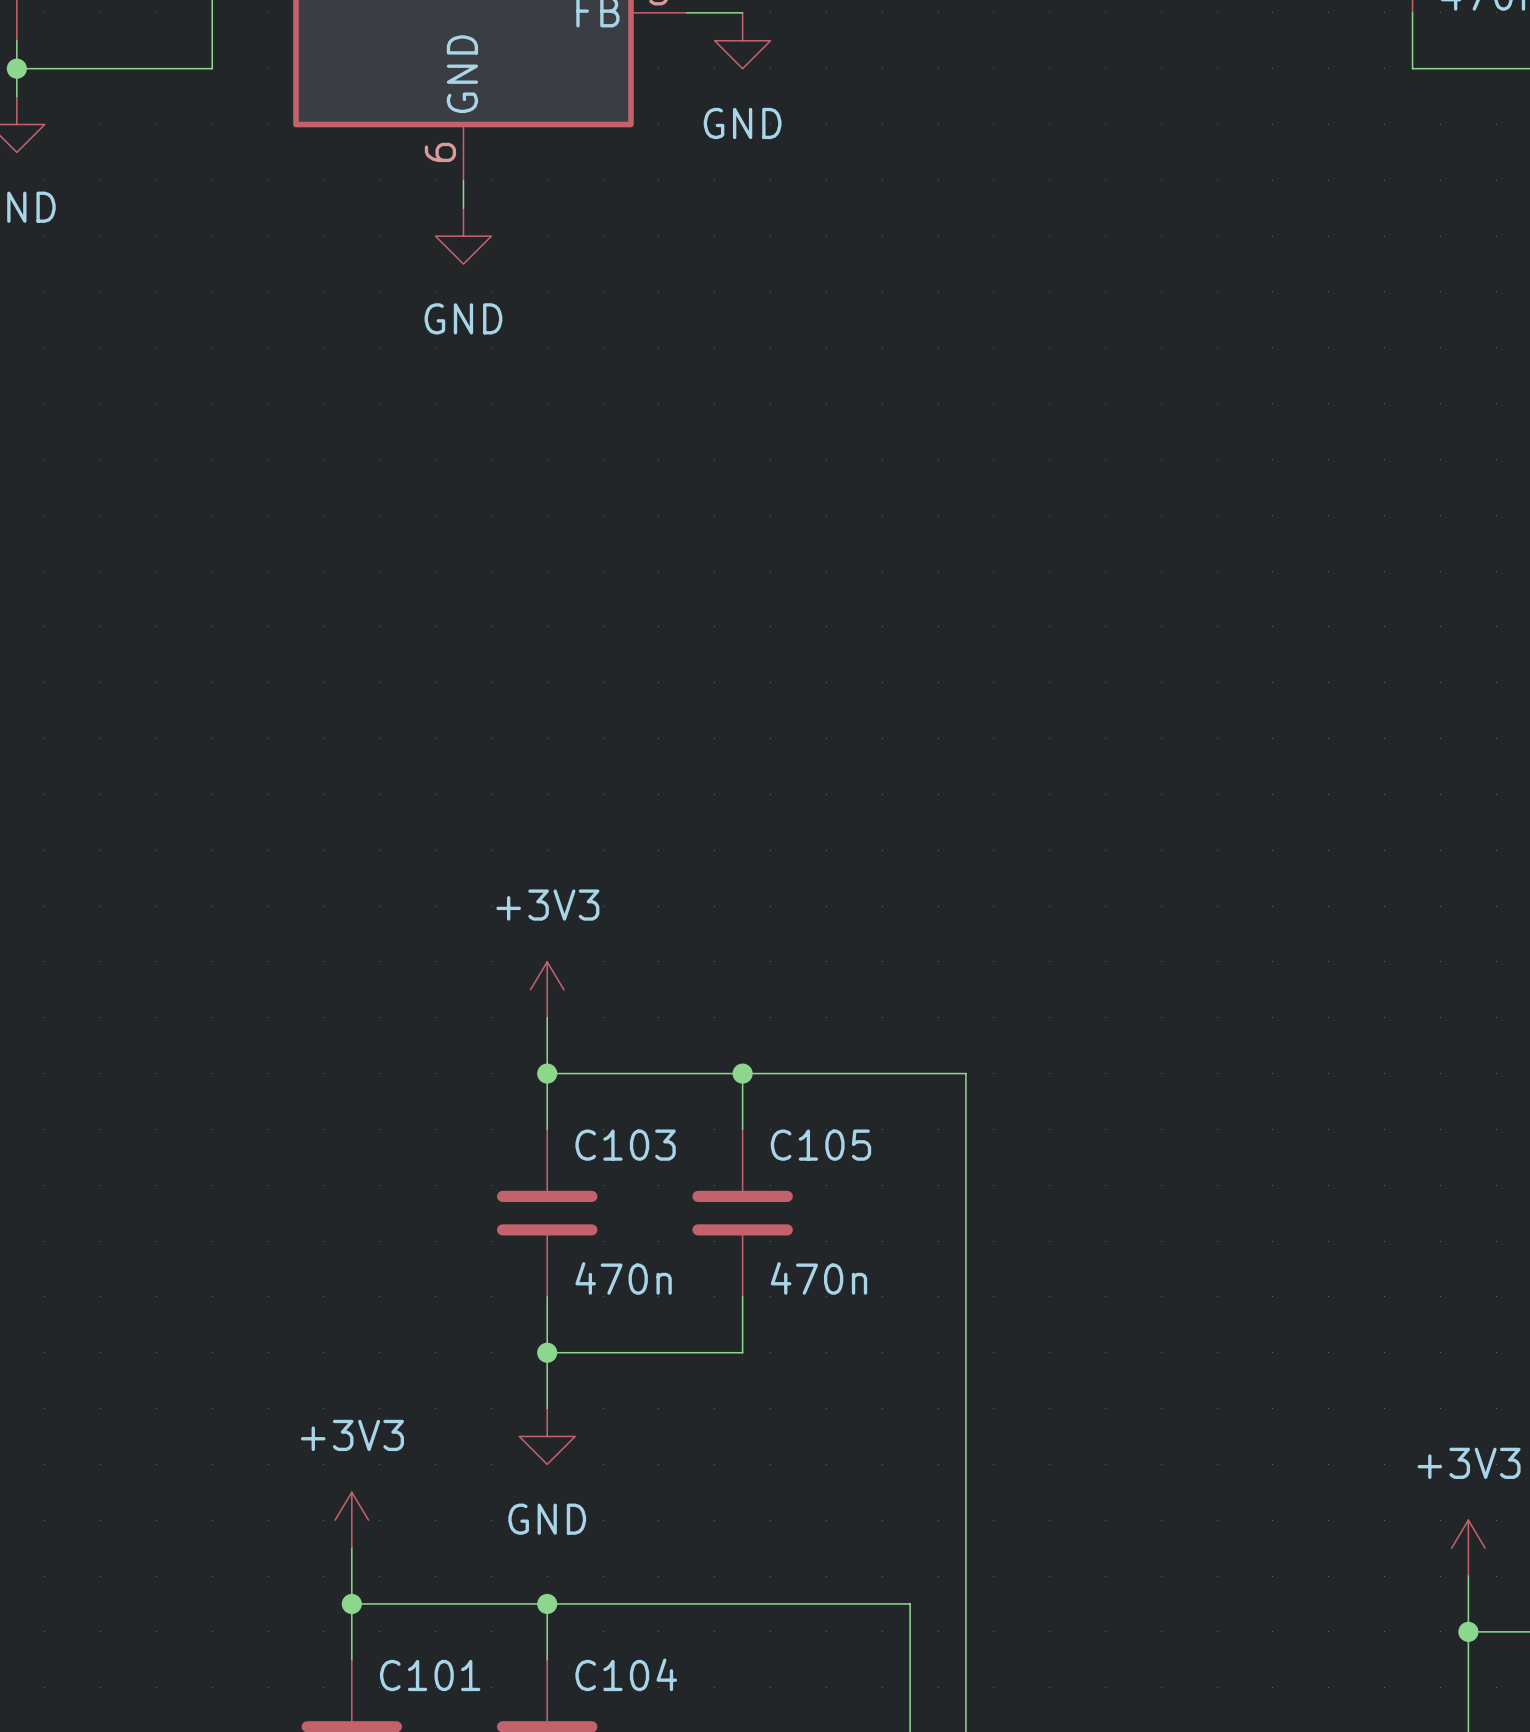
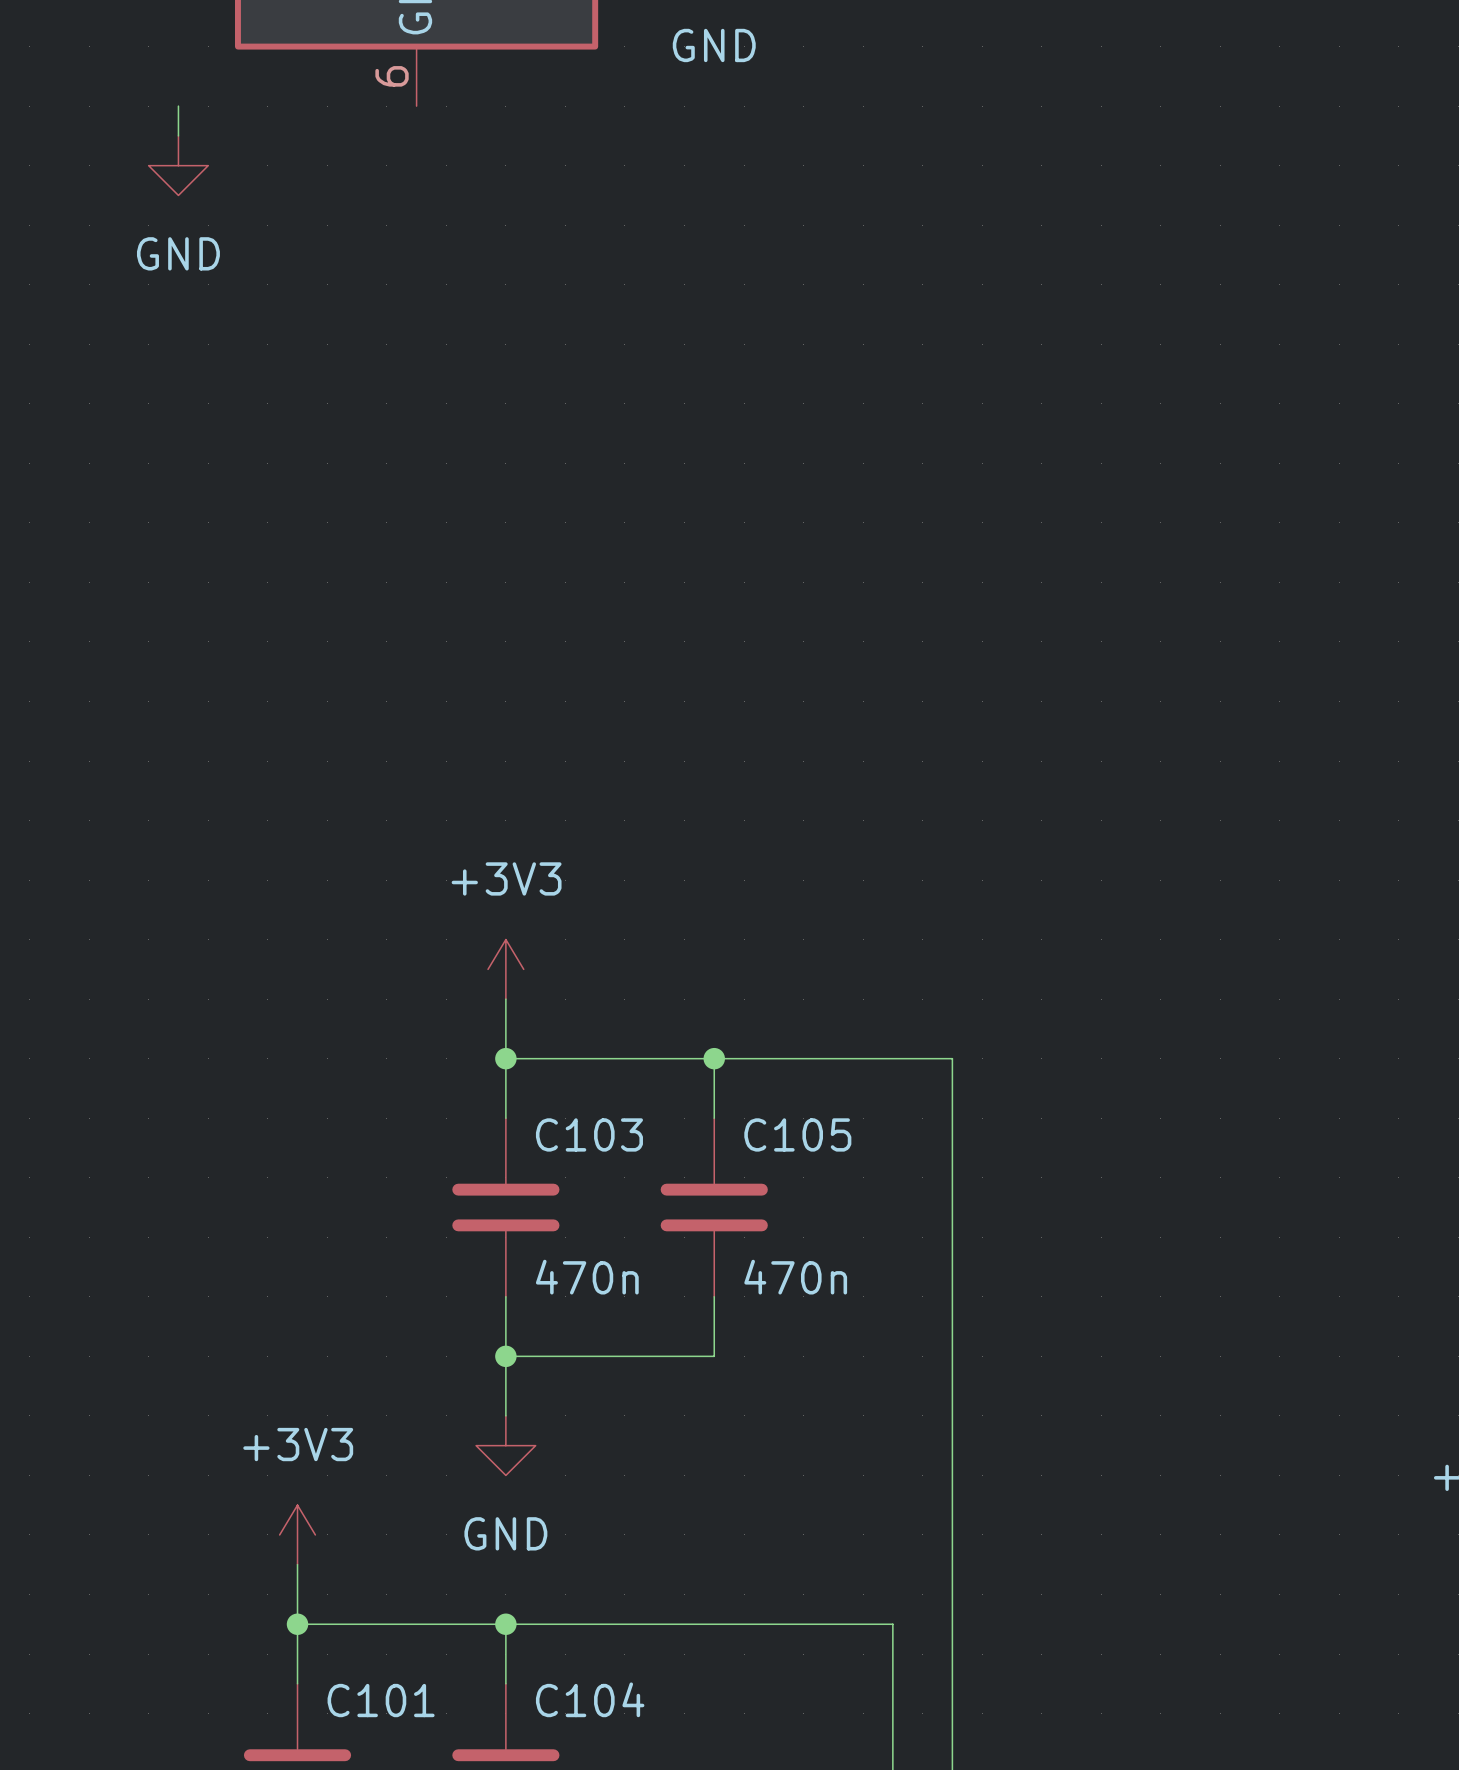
wire: (463, 180) (463, 208) -> (178, 106) (178, 135)
power symbol position: GND (463, 236) -> GND (178, 165)

